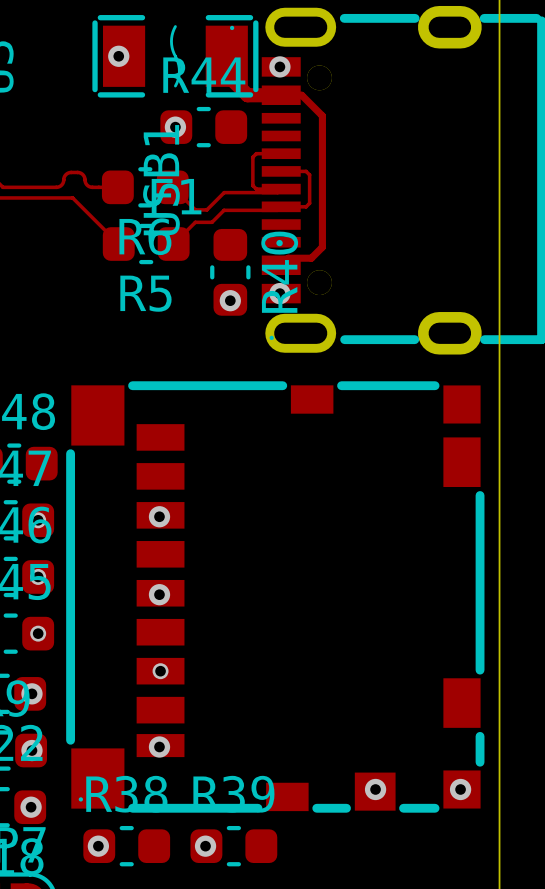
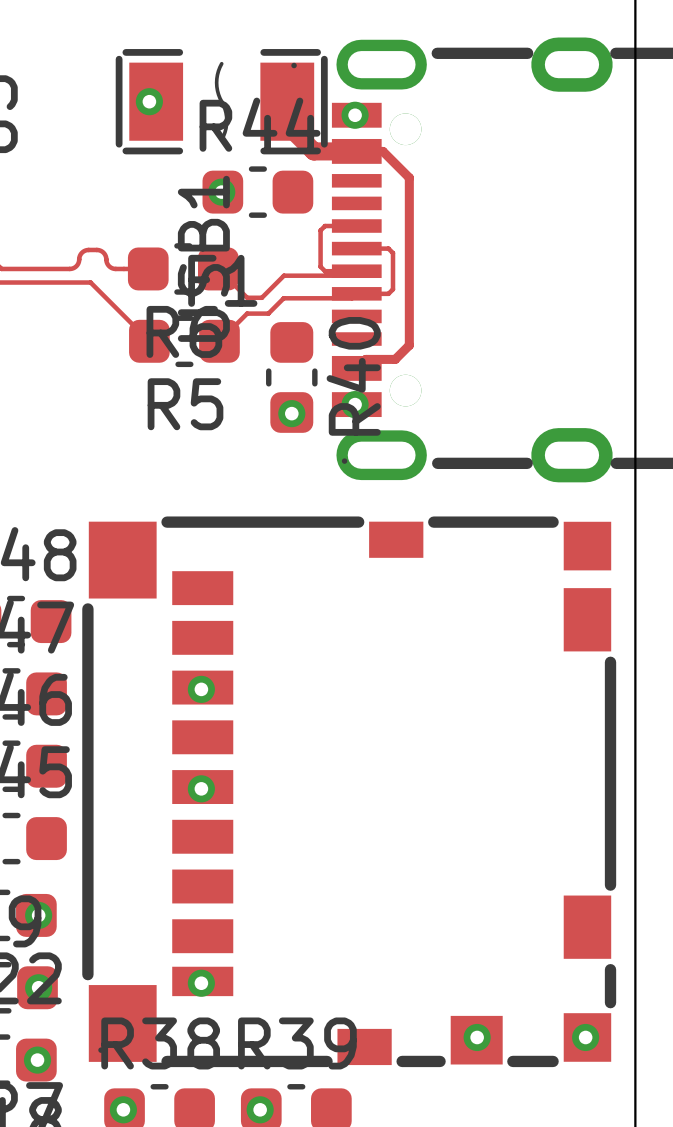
via: (38, 520) -> none
via: (38, 576) -> none
via: (38, 633) -> none
via: (160, 671) -> none

